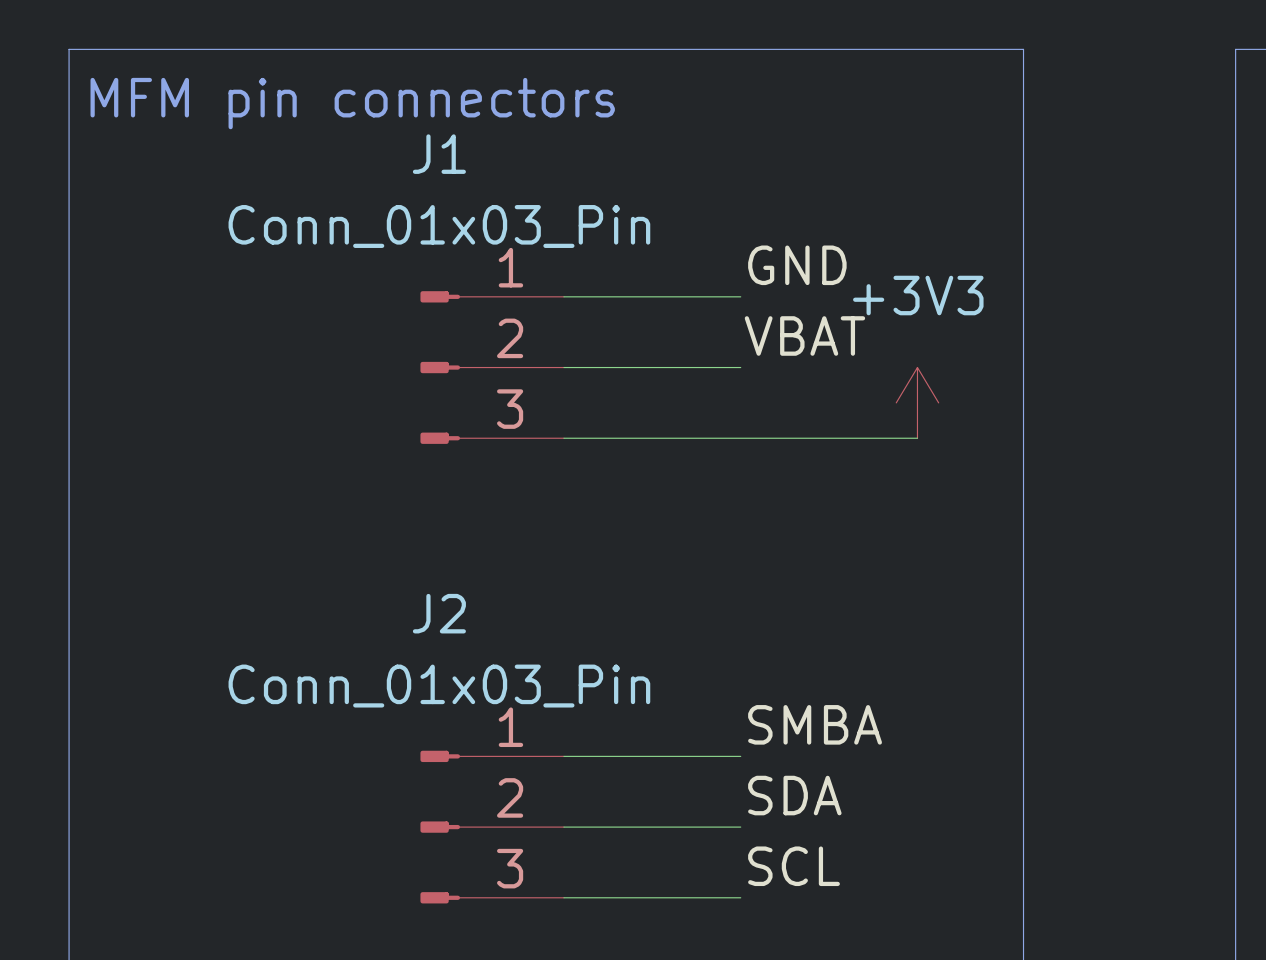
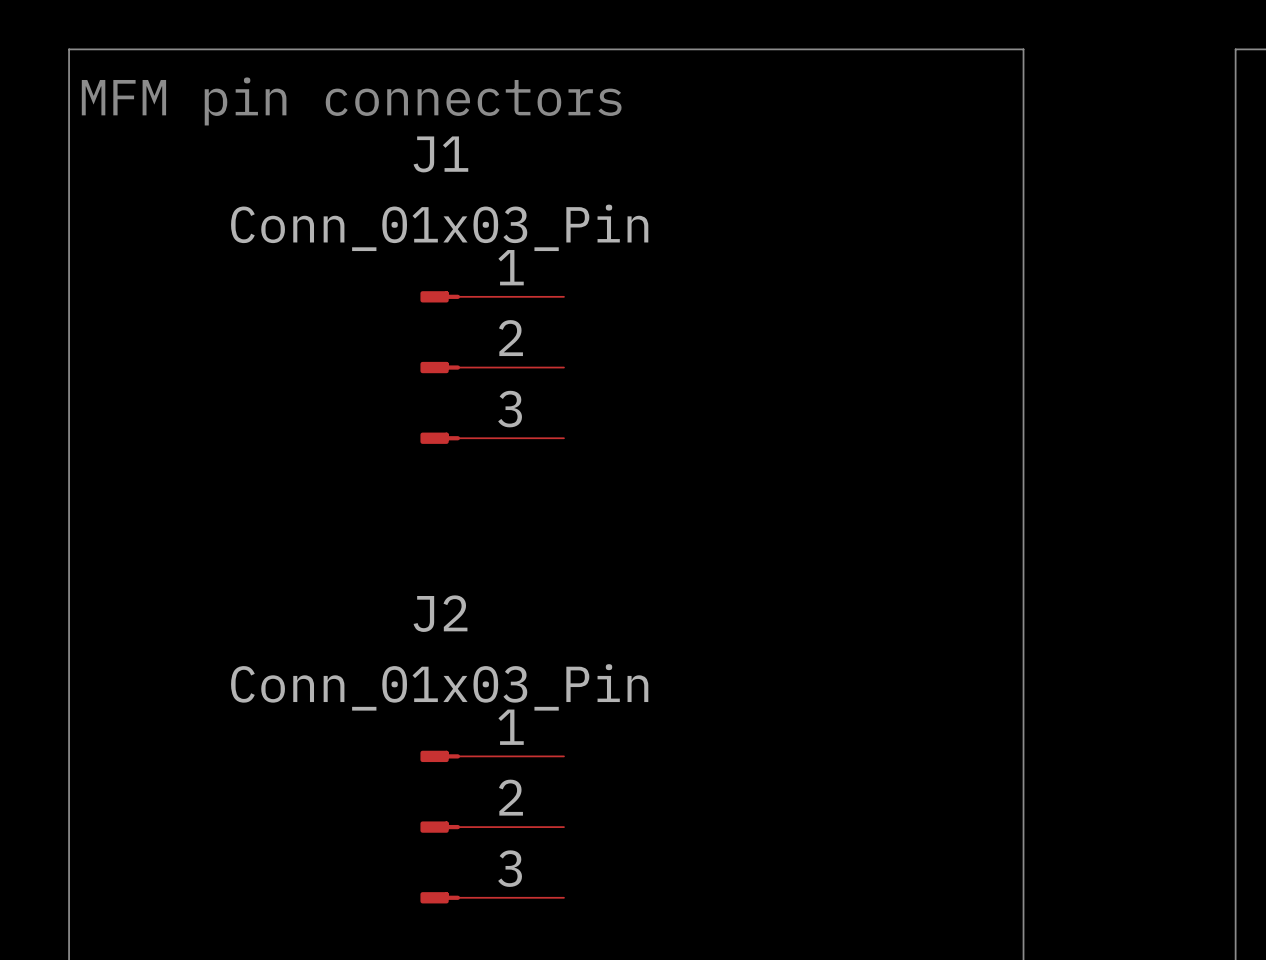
label: GND (797, 265) -> none
wire: (563, 296) (740, 296) -> none
label: VBAT (804, 335) -> none
wire: (563, 367) (740, 367) -> none
power symbol: +3V3 (917, 402) -> none
wire: (563, 438) (917, 438) -> none
label: SMBA (815, 724) -> none
wire: (563, 756) (740, 756) -> none
label: SDA (794, 795) -> none
wire: (563, 827) (740, 827) -> none
label: SCL (794, 866) -> none
wire: (563, 897) (740, 897) -> none

